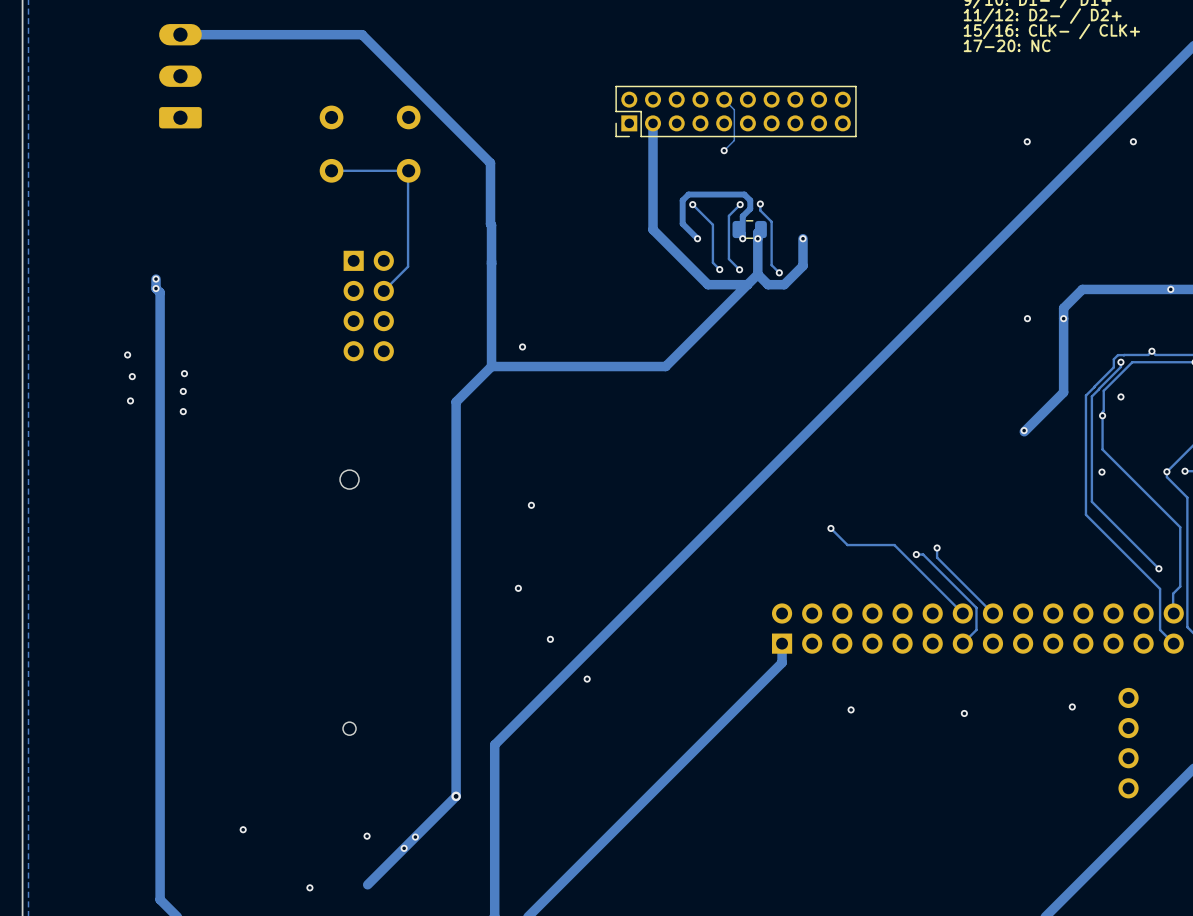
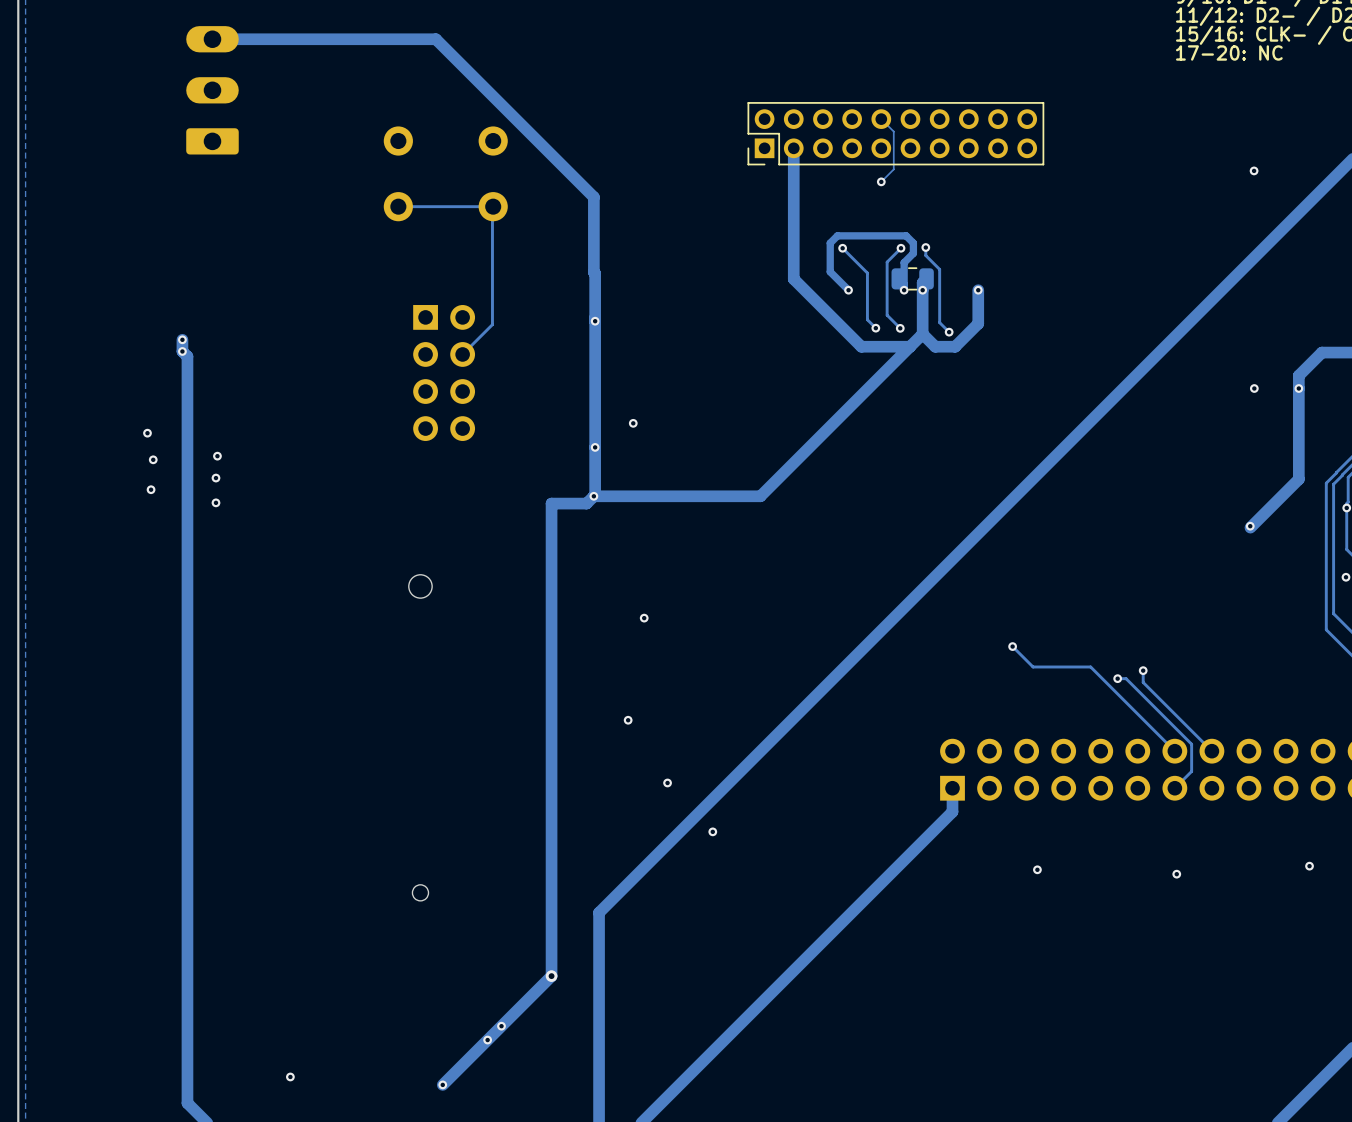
via: none -> (595, 321)
track: none -> (595, 447) (595, 495) (586, 503) (551, 503)
via: none -> (595, 447)
track: (665, 366) (491, 366) (456, 401) (456, 412) -> (809, 447) (760, 496) (593, 496)
via: none -> (593, 496)
via: (243, 829) -> none
via: (367, 836) -> none
via: none -> (290, 1076)
via: none -> (442, 1084)
via: (309, 887) -> none

